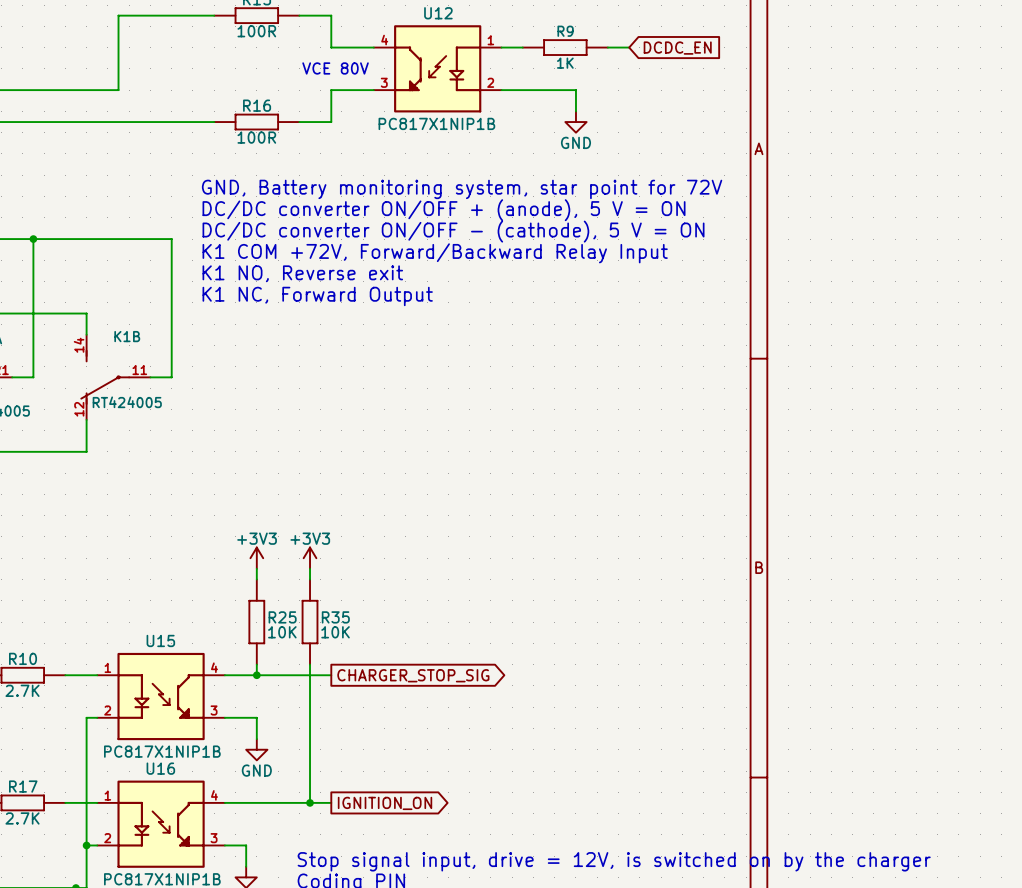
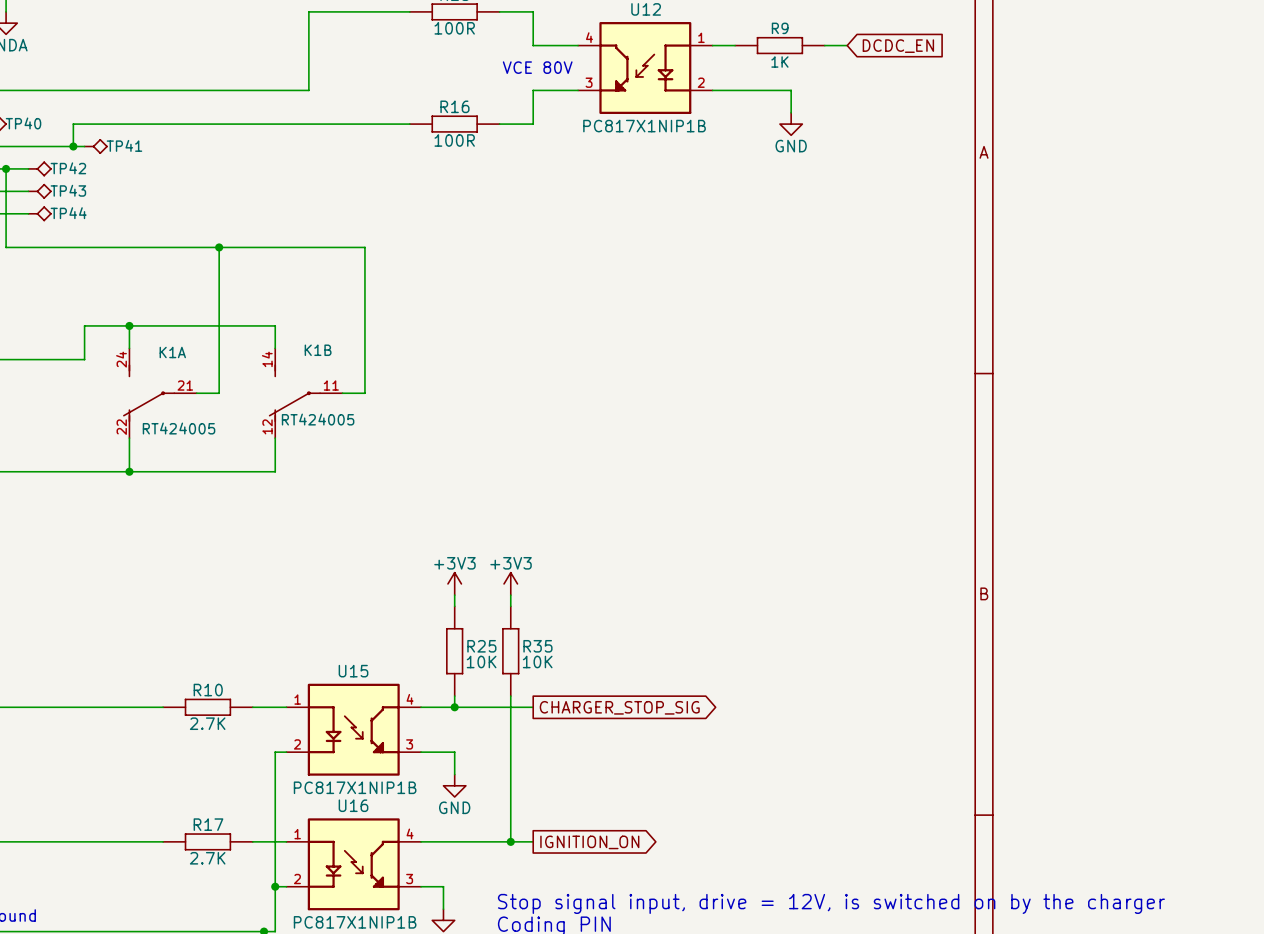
text: GND, Battery monitoring system, star point for 72V (462, 189) -> none
text: DC/DC converter ON/OFF + (anode), 5 V = ON (444, 210) -> none
text: DC/DC converter ON/OFF - (cathode), 5 V = ON (453, 231) -> none
text: K1 COM +72V, Forward/Backward Relay Input (435, 253) -> none
text: K1 NO, Reverse exit (302, 273) -> none
text: K1 NC, Forward Output (317, 296) -> none

